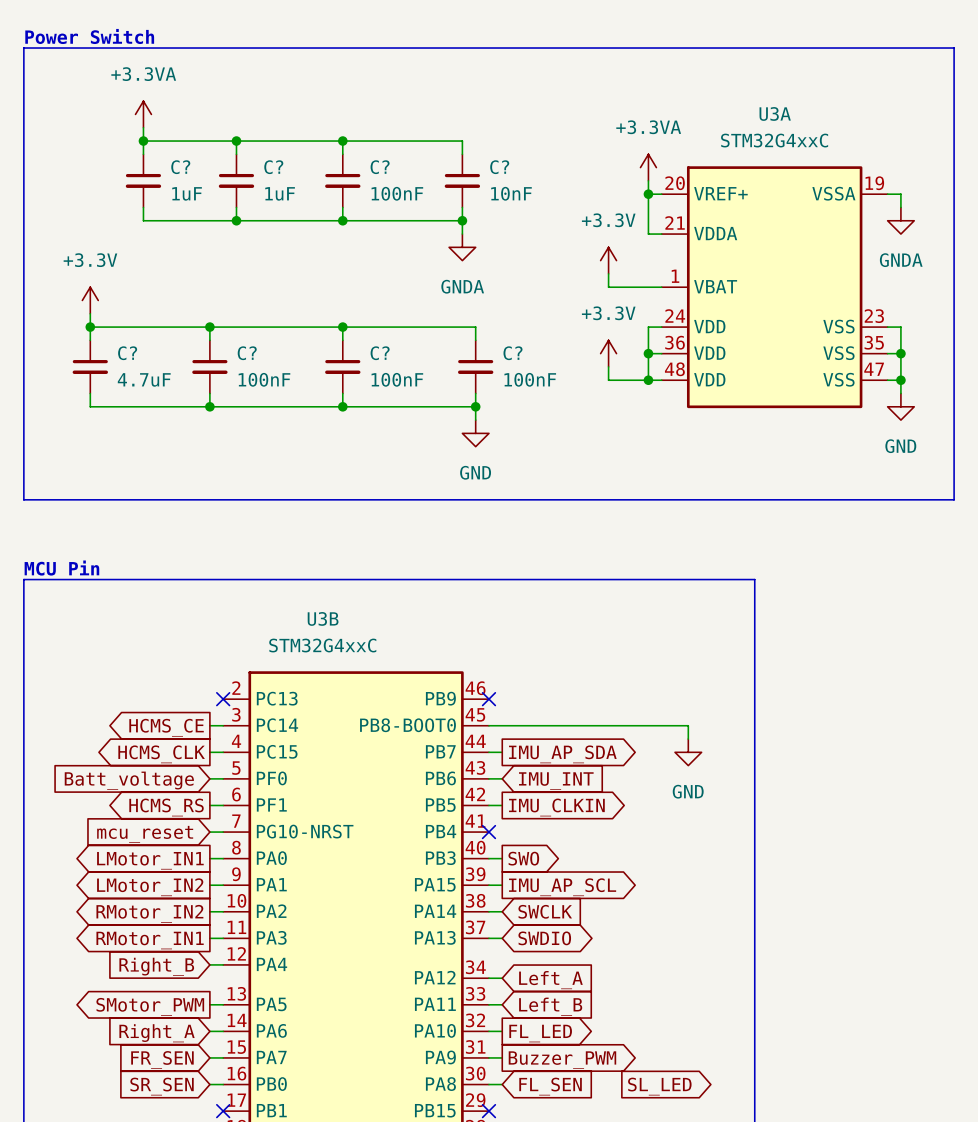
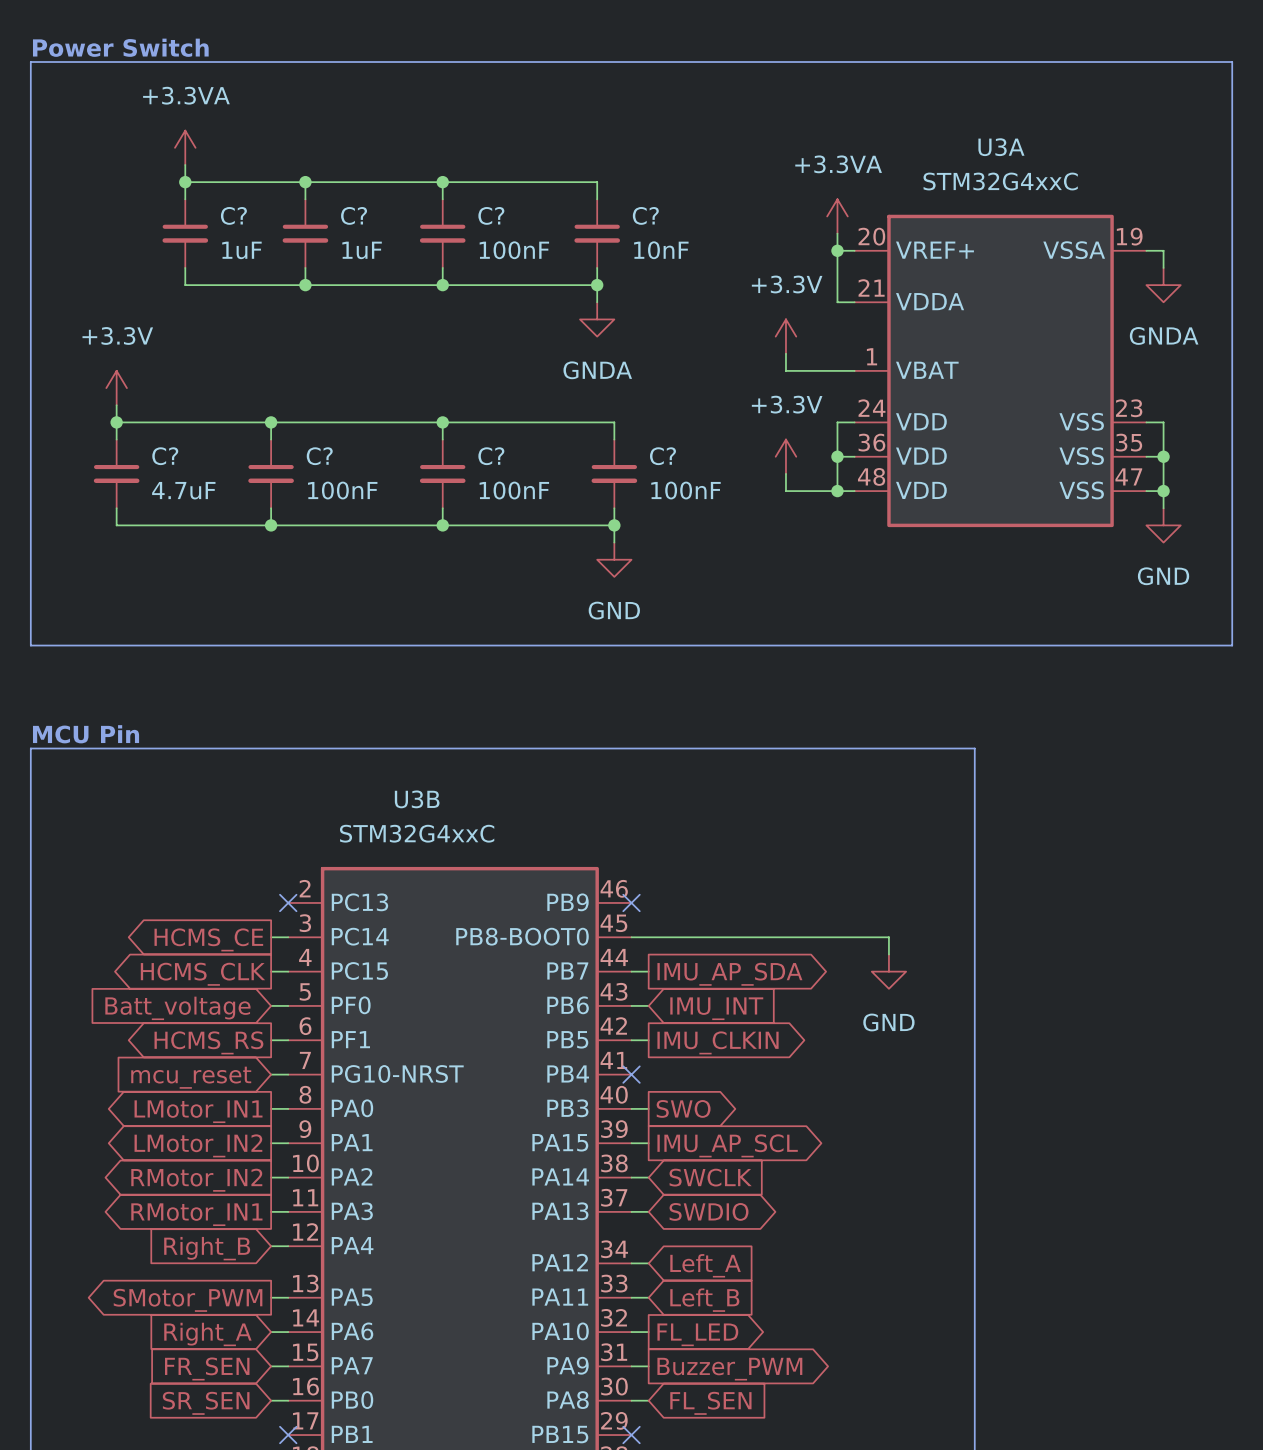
global label: SL_LED (659, 1086) -> none

